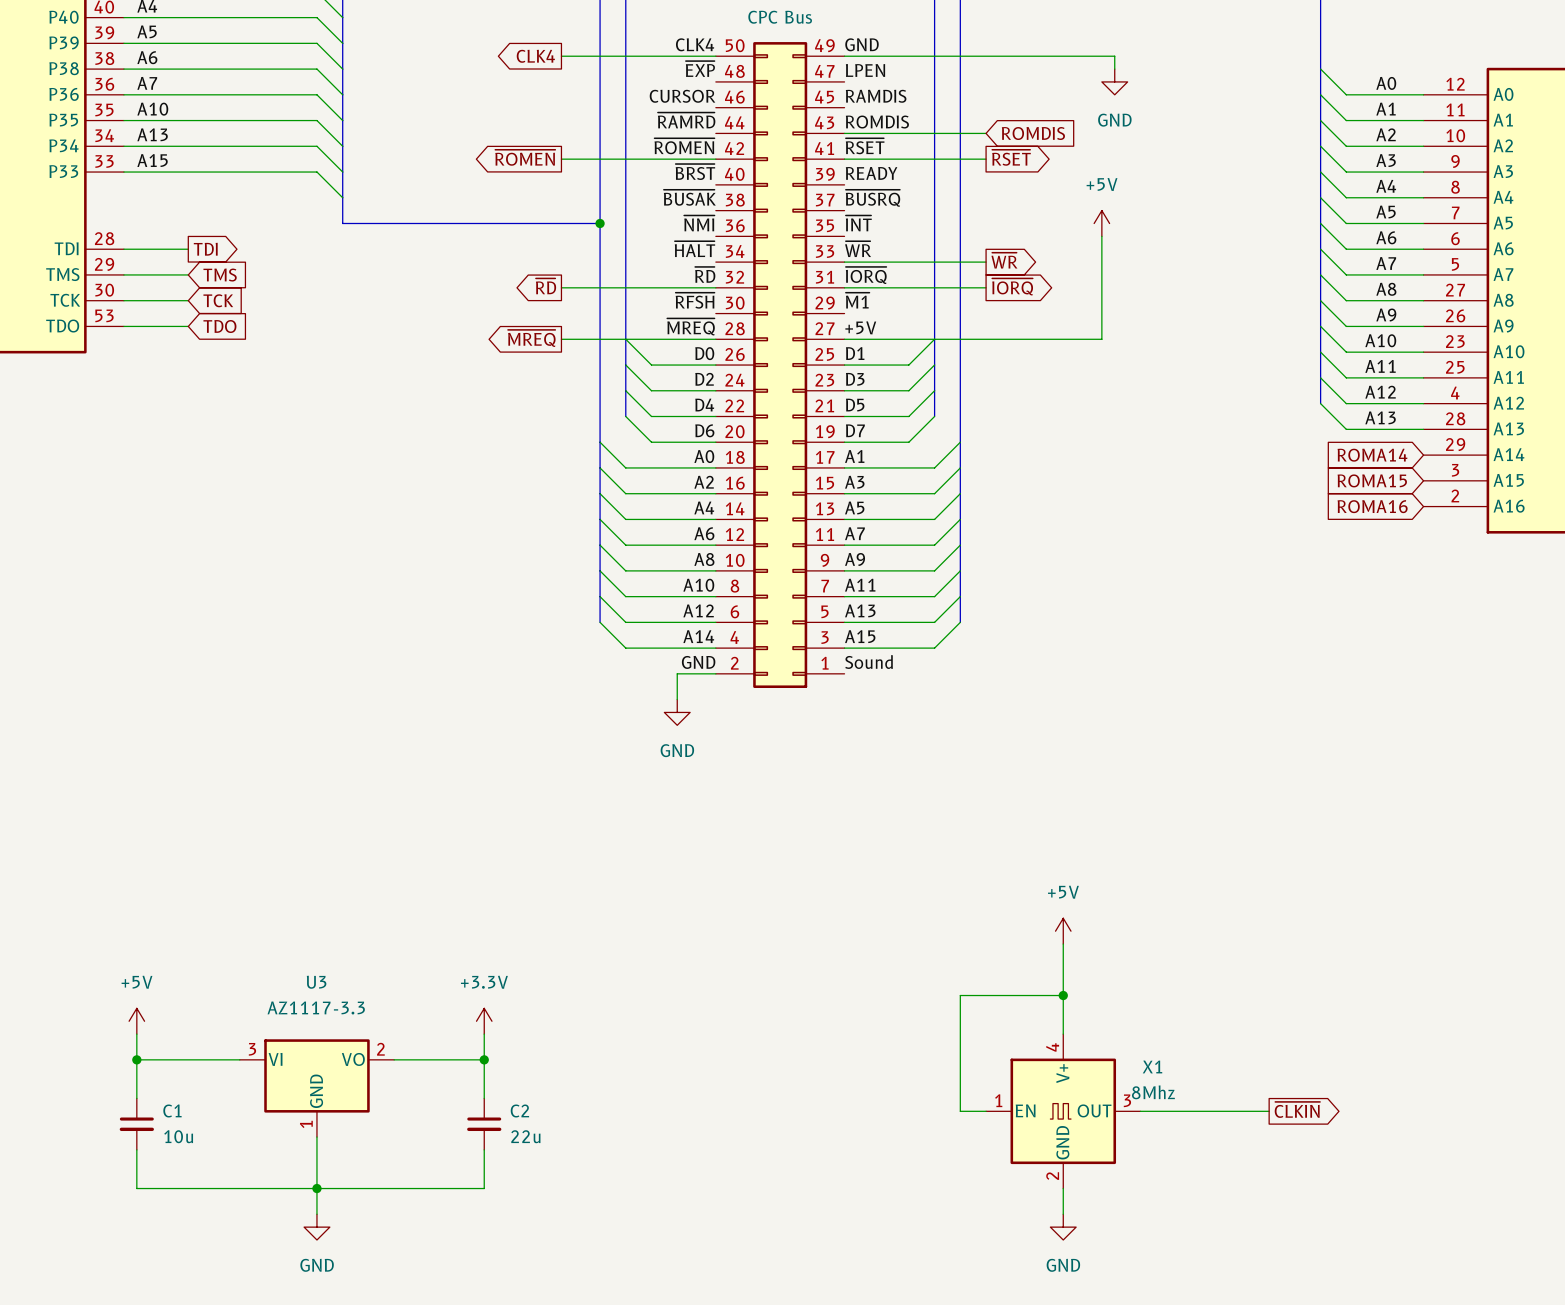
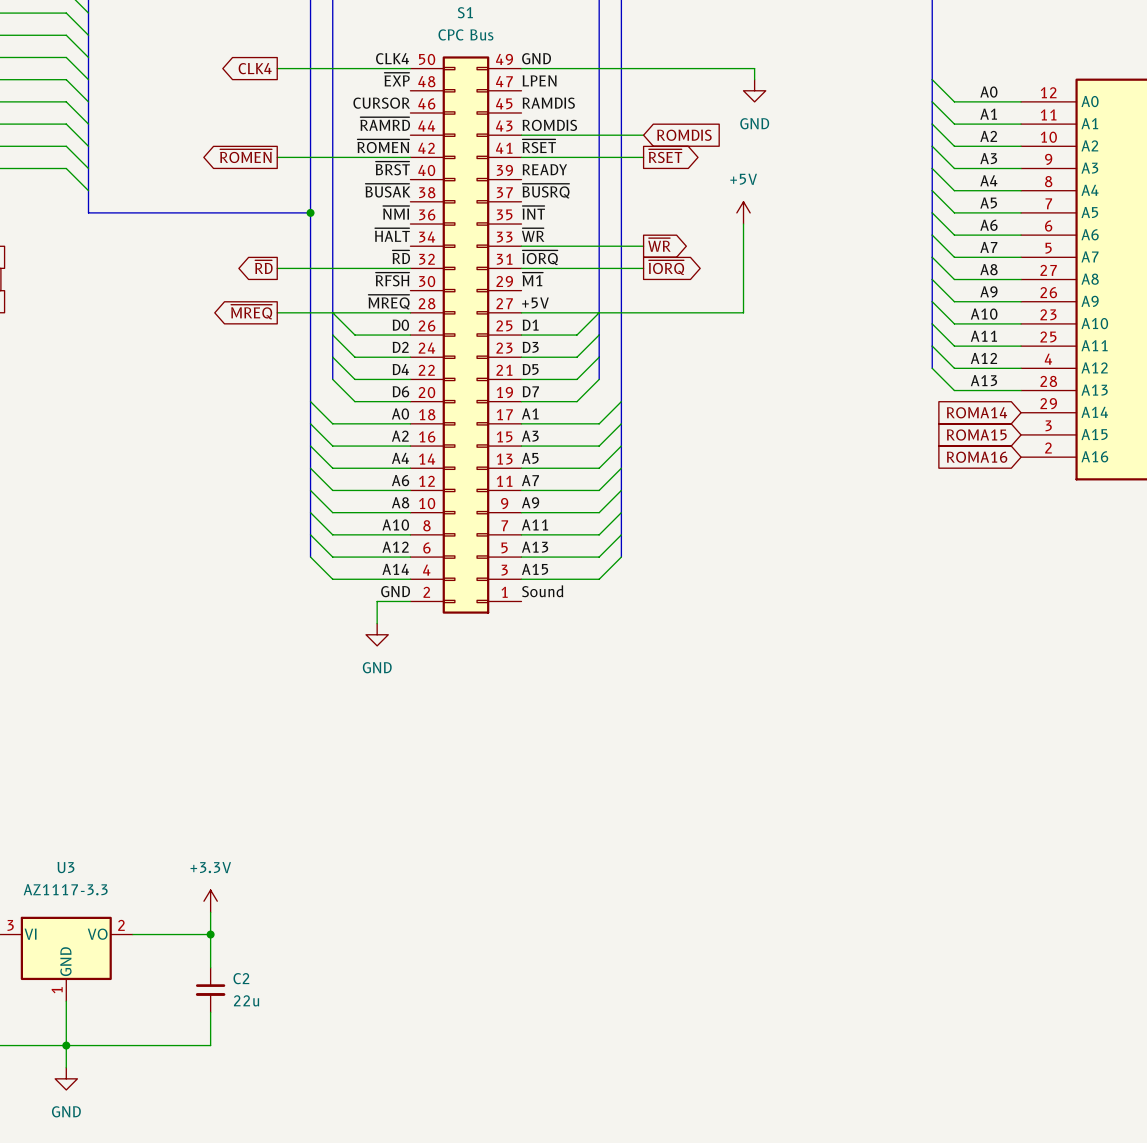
power symbol: +5V (1063, 931) -> none
wire: (1063, 944) (1063, 1034) -> none
wire: (1063, 995) (960, 995) (960, 1111) (986, 1111) -> none
junction: (1063, 995) -> none
global label: ~{CLKIN} (1297, 1109) -> none
X1: 8Mhz (1063, 1111) -> none
wire: (1140, 1111) (1269, 1111) -> none
wire: (1063, 1188) (1063, 1214) -> none
power symbol: GND (1063, 1227) -> none

